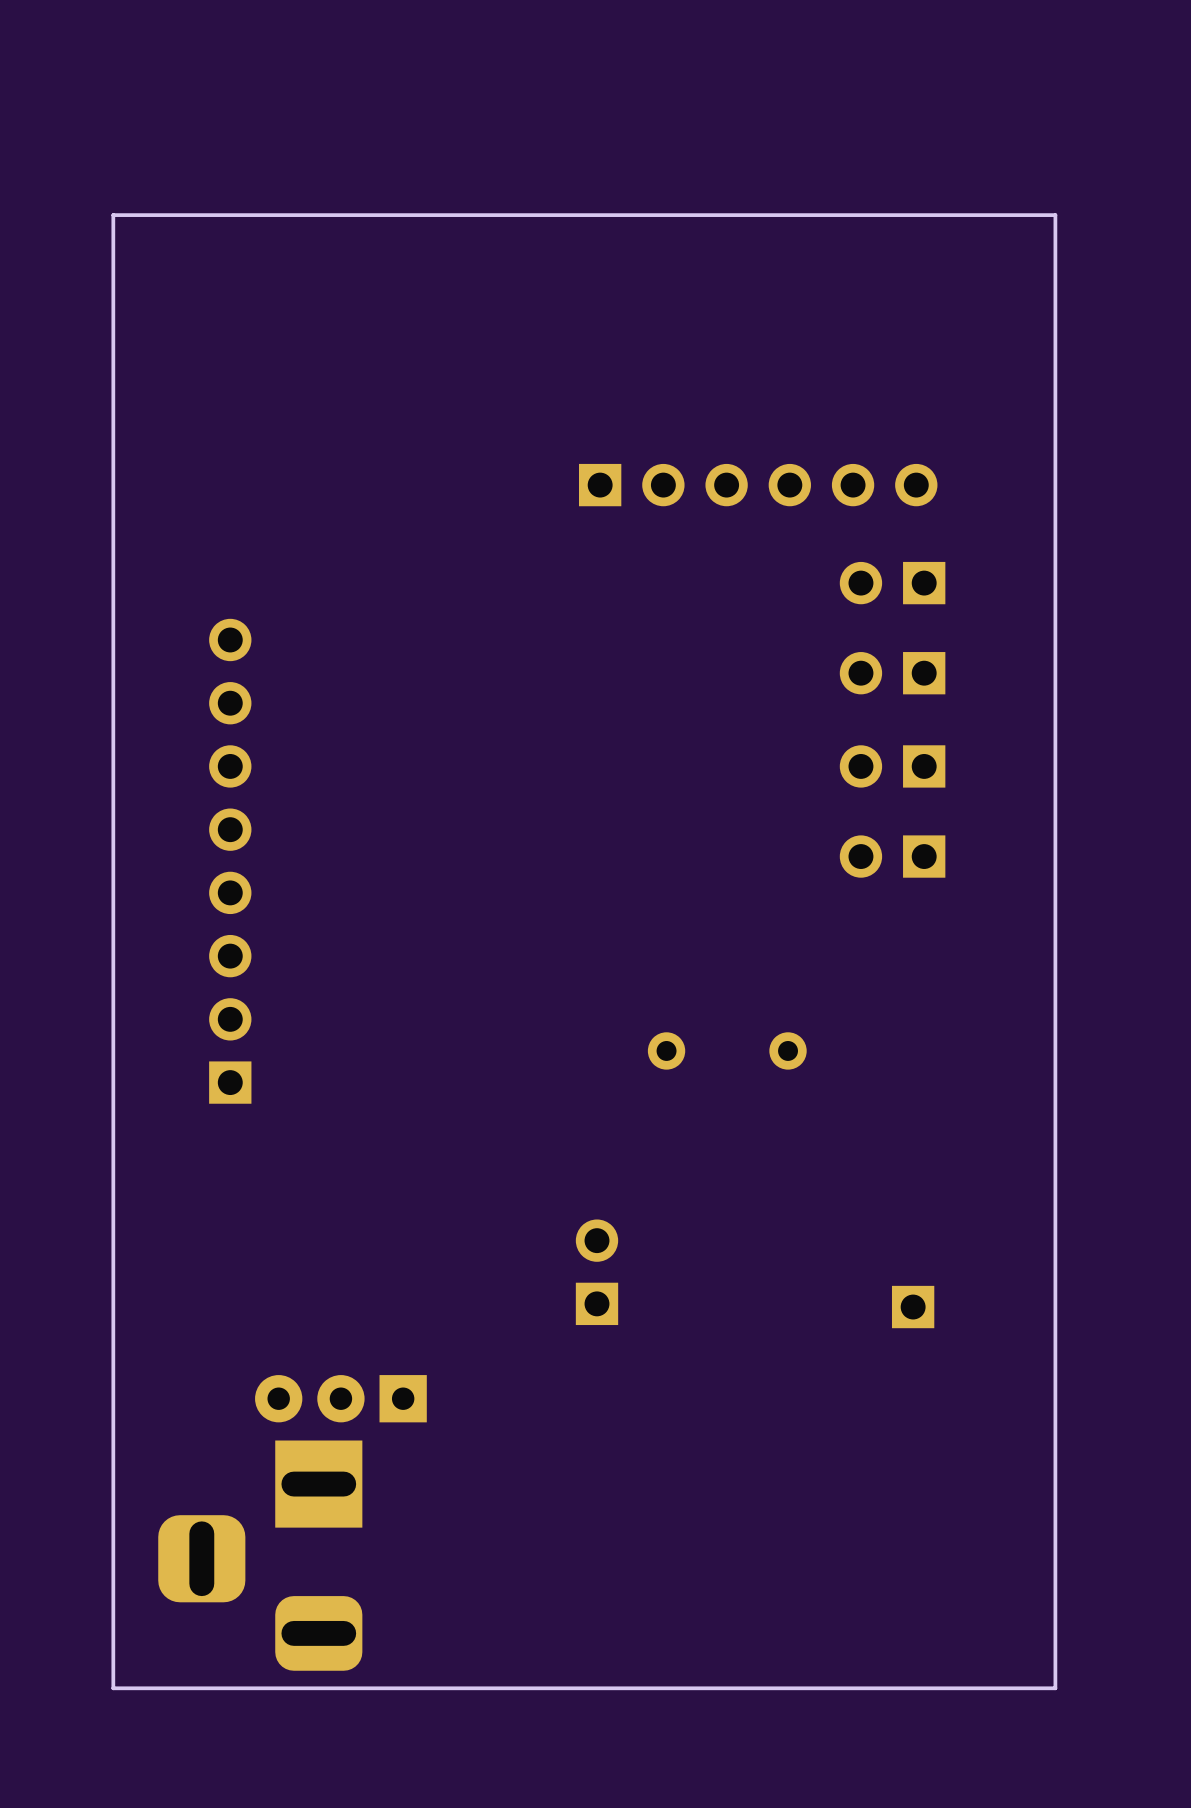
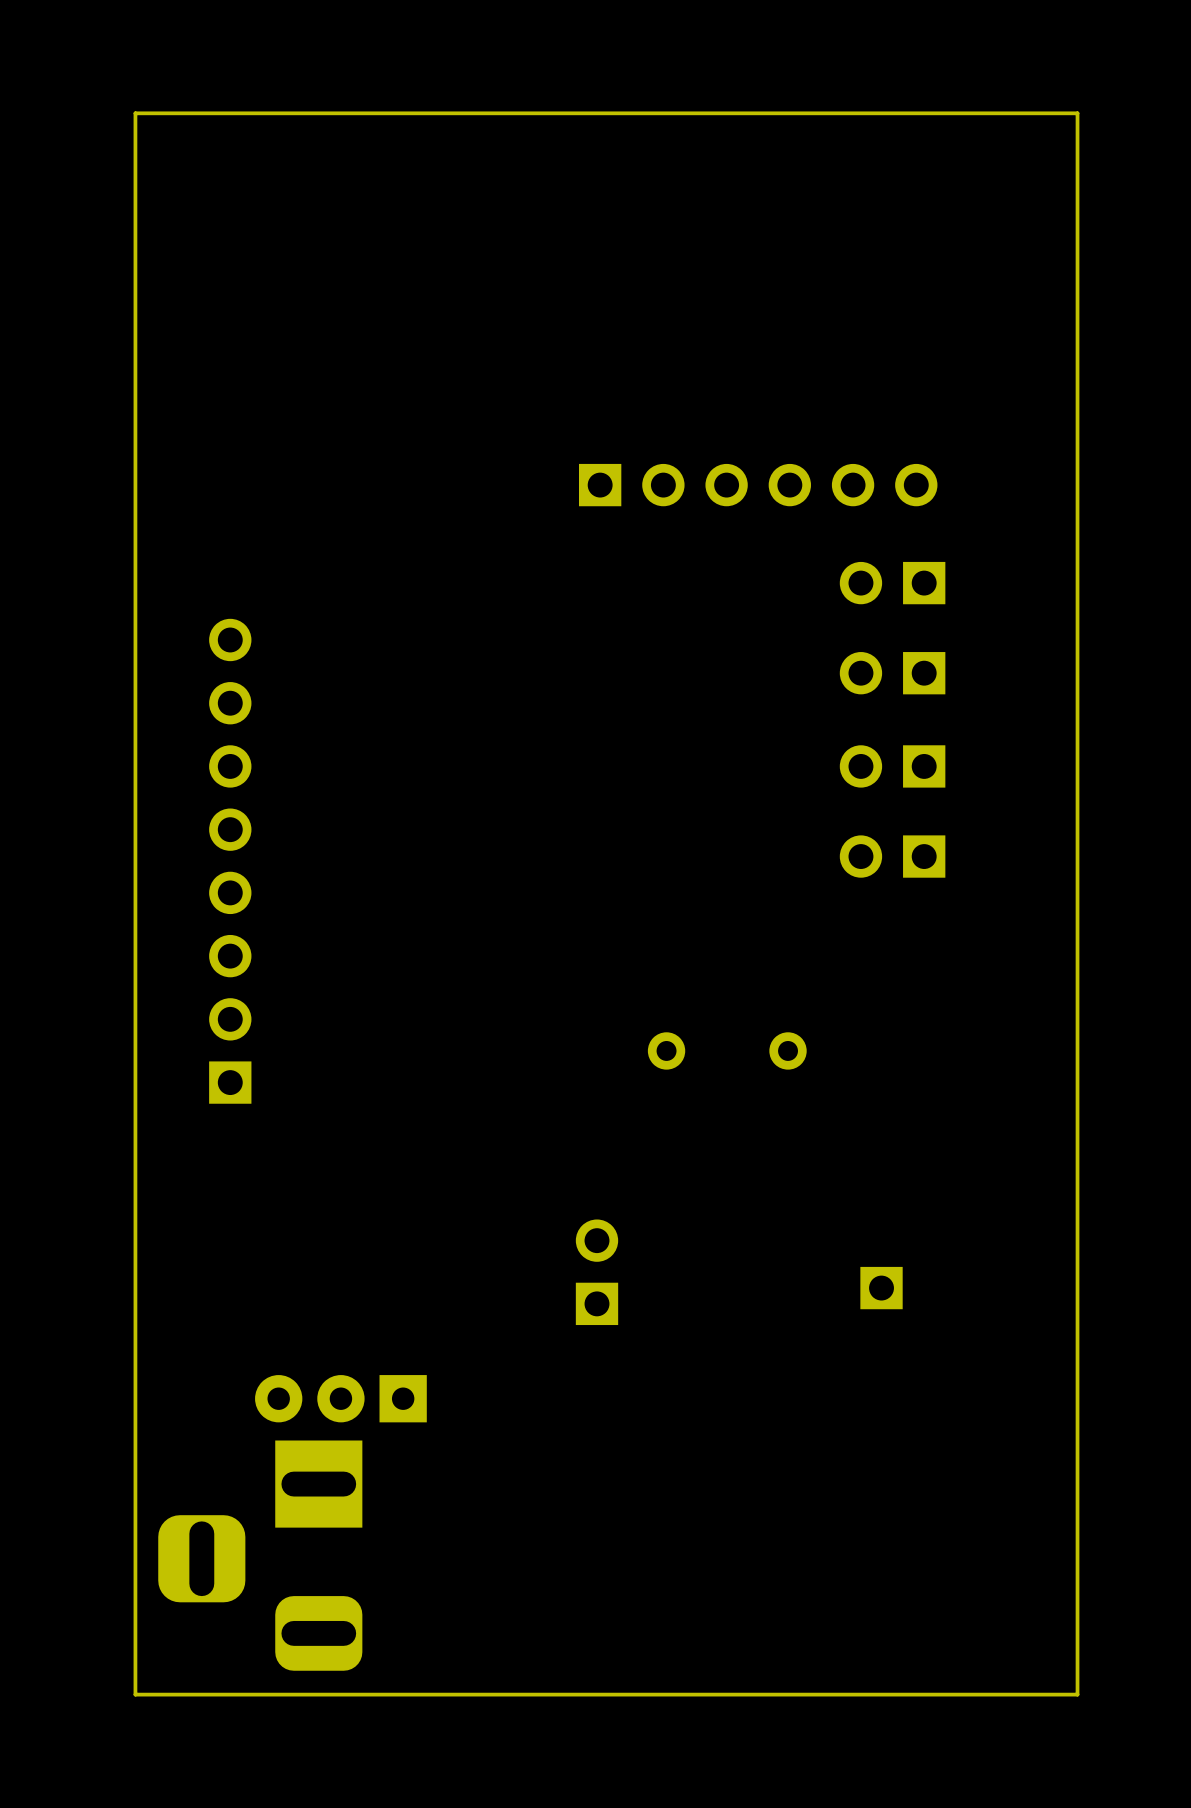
board edge: (1055, 215) (1055, 1688) (113, 1688) (113, 215) (1055, 215) -> (1077, 113) (1077, 1694) (135, 1694) (135, 113) (1077, 113)
part position: (913, 1307) -> (881, 1288)

